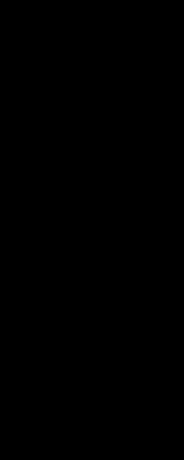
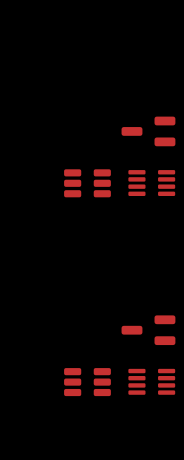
part: none -> (148, 131)
part: none -> (87, 183)
part: none -> (151, 183)
part: none -> (148, 330)
part: none -> (151, 381)
part: none -> (87, 382)

